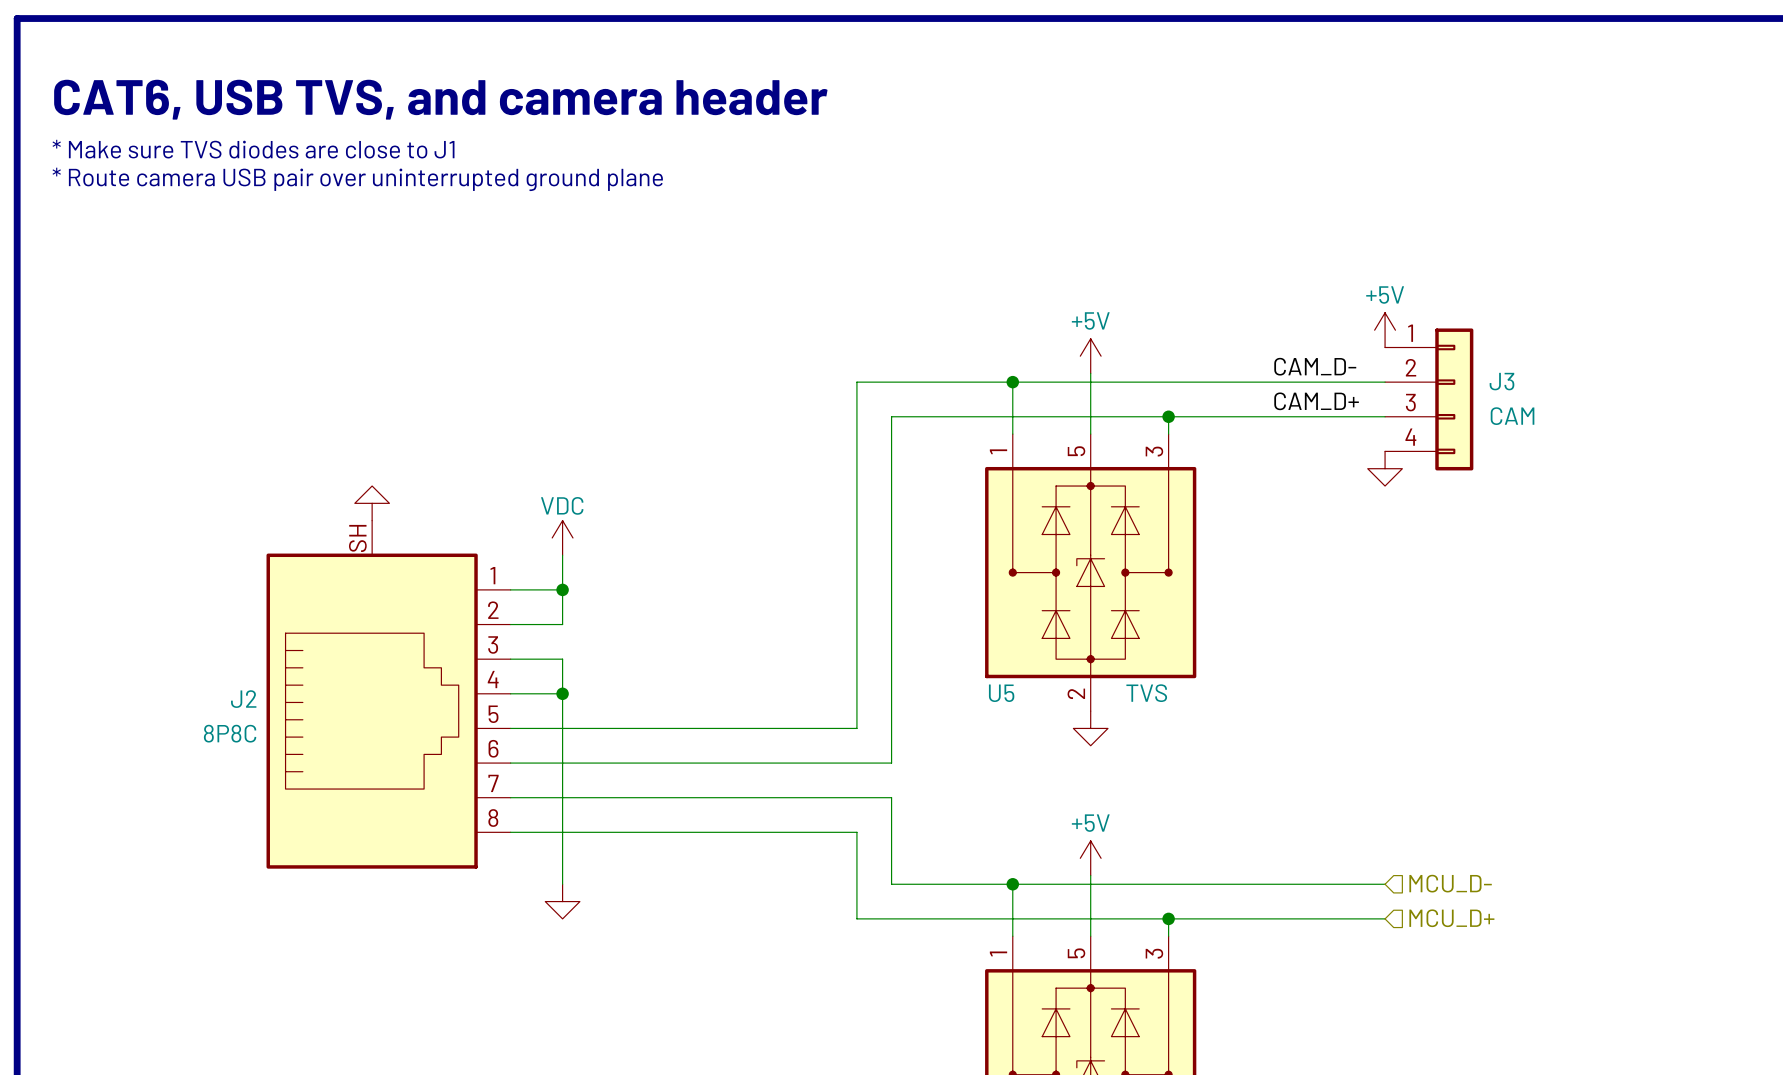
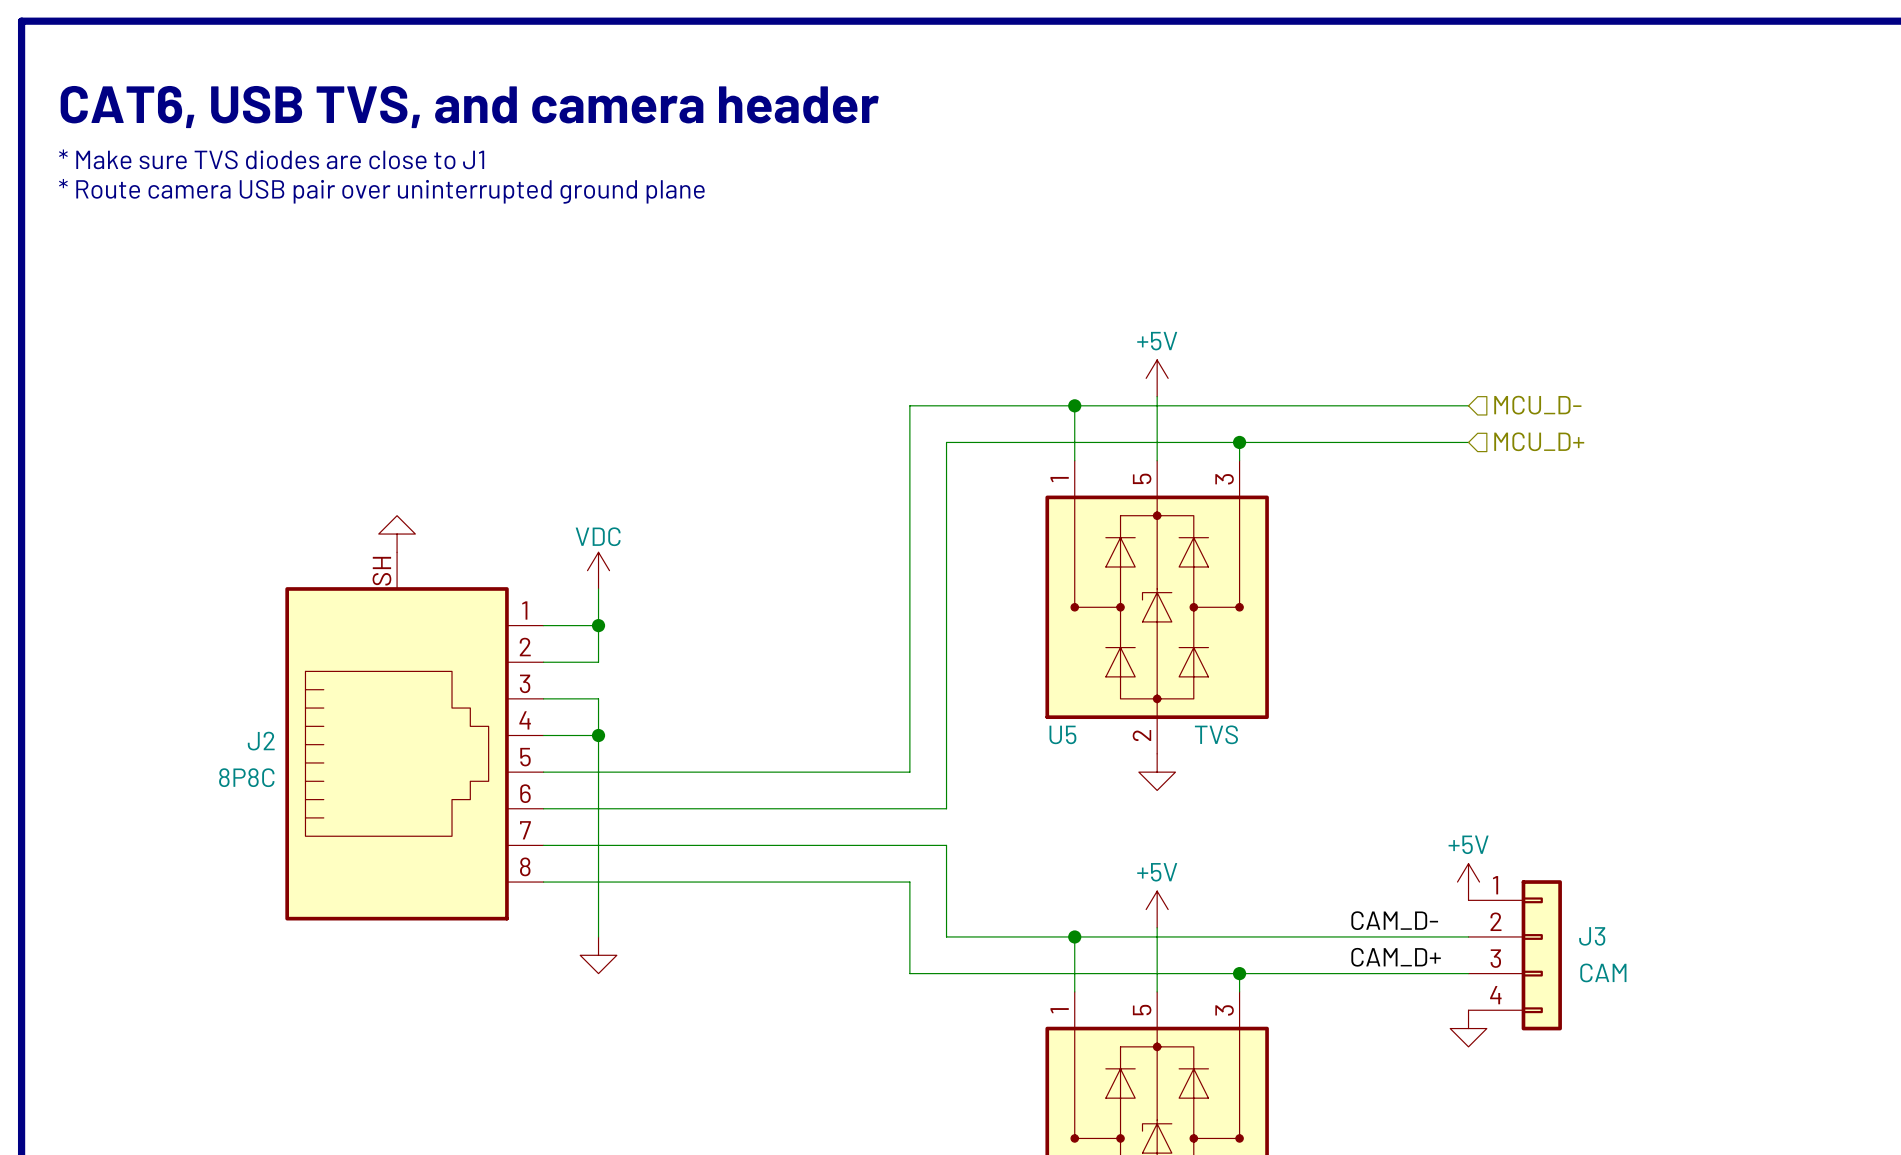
power symbol: +5V (1385, 330) -> none
label: CAM_D- (1315, 366) -> none
hierarchical label: none -> MCU_D- (1537, 405)
J3 position: (1429, 399) -> (1515, 955)
label: CAM_D+ (1316, 401) -> none
hierarchical label: none -> MCU_D+ (1539, 441)
power symbol: (1385, 468) -> none
power symbol: none -> +5V (1468, 882)
label: none -> CAM_D- (1394, 920)
hierarchical label: MCU_D- (1450, 883) -> none
label: none -> CAM_D+ (1396, 957)
hierarchical label: MCU_D+ (1451, 918) -> none
power symbol: none -> (1468, 1028)

